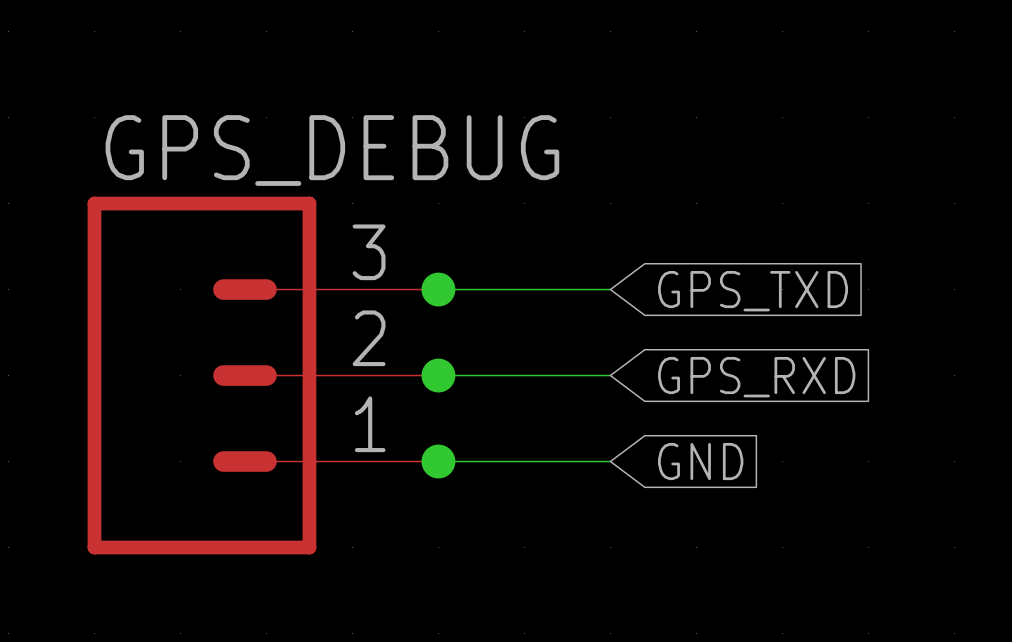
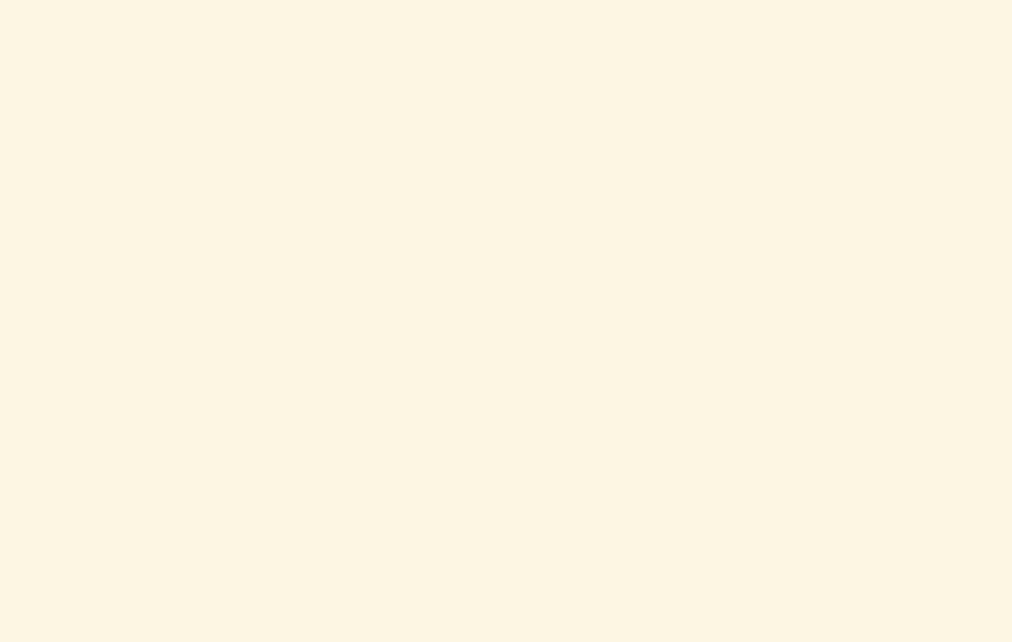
wire: (438, 289) (610, 289) -> none
junction: (438, 289) -> none
global label: GPS_TXD (753, 291) -> none
GPS_DEBUG: (263, 375) -> none
wire: (438, 375) (610, 375) -> none
junction: (438, 375) -> none
global label: GPS_RXD (756, 377) -> none
wire: (438, 461) (610, 461) -> none
junction: (438, 461) -> none
global label: GND (700, 461) -> none

